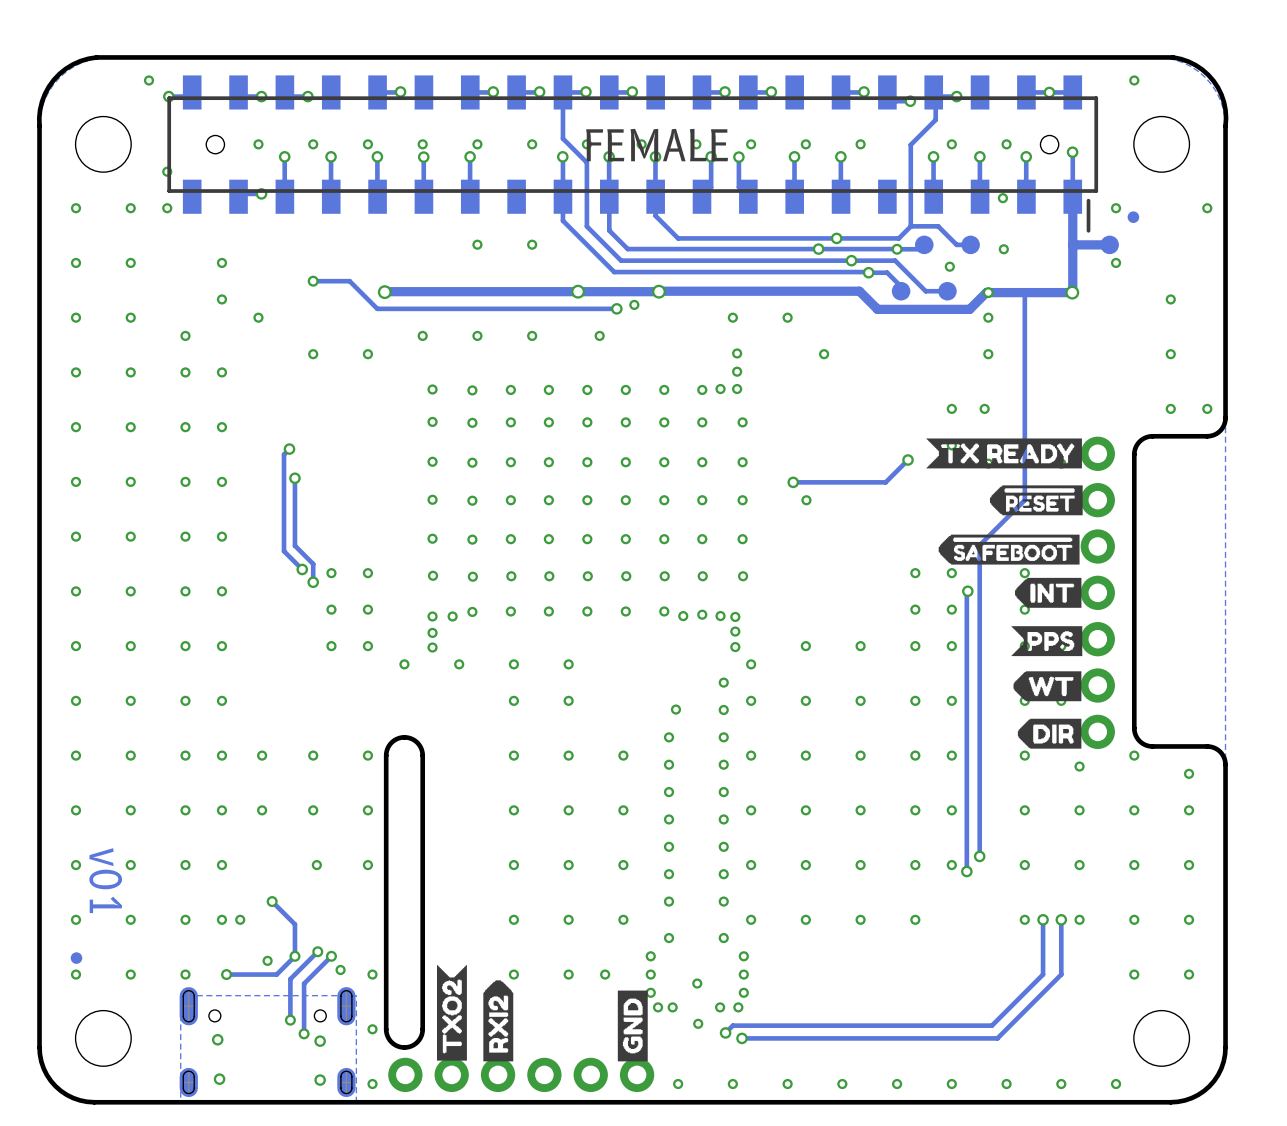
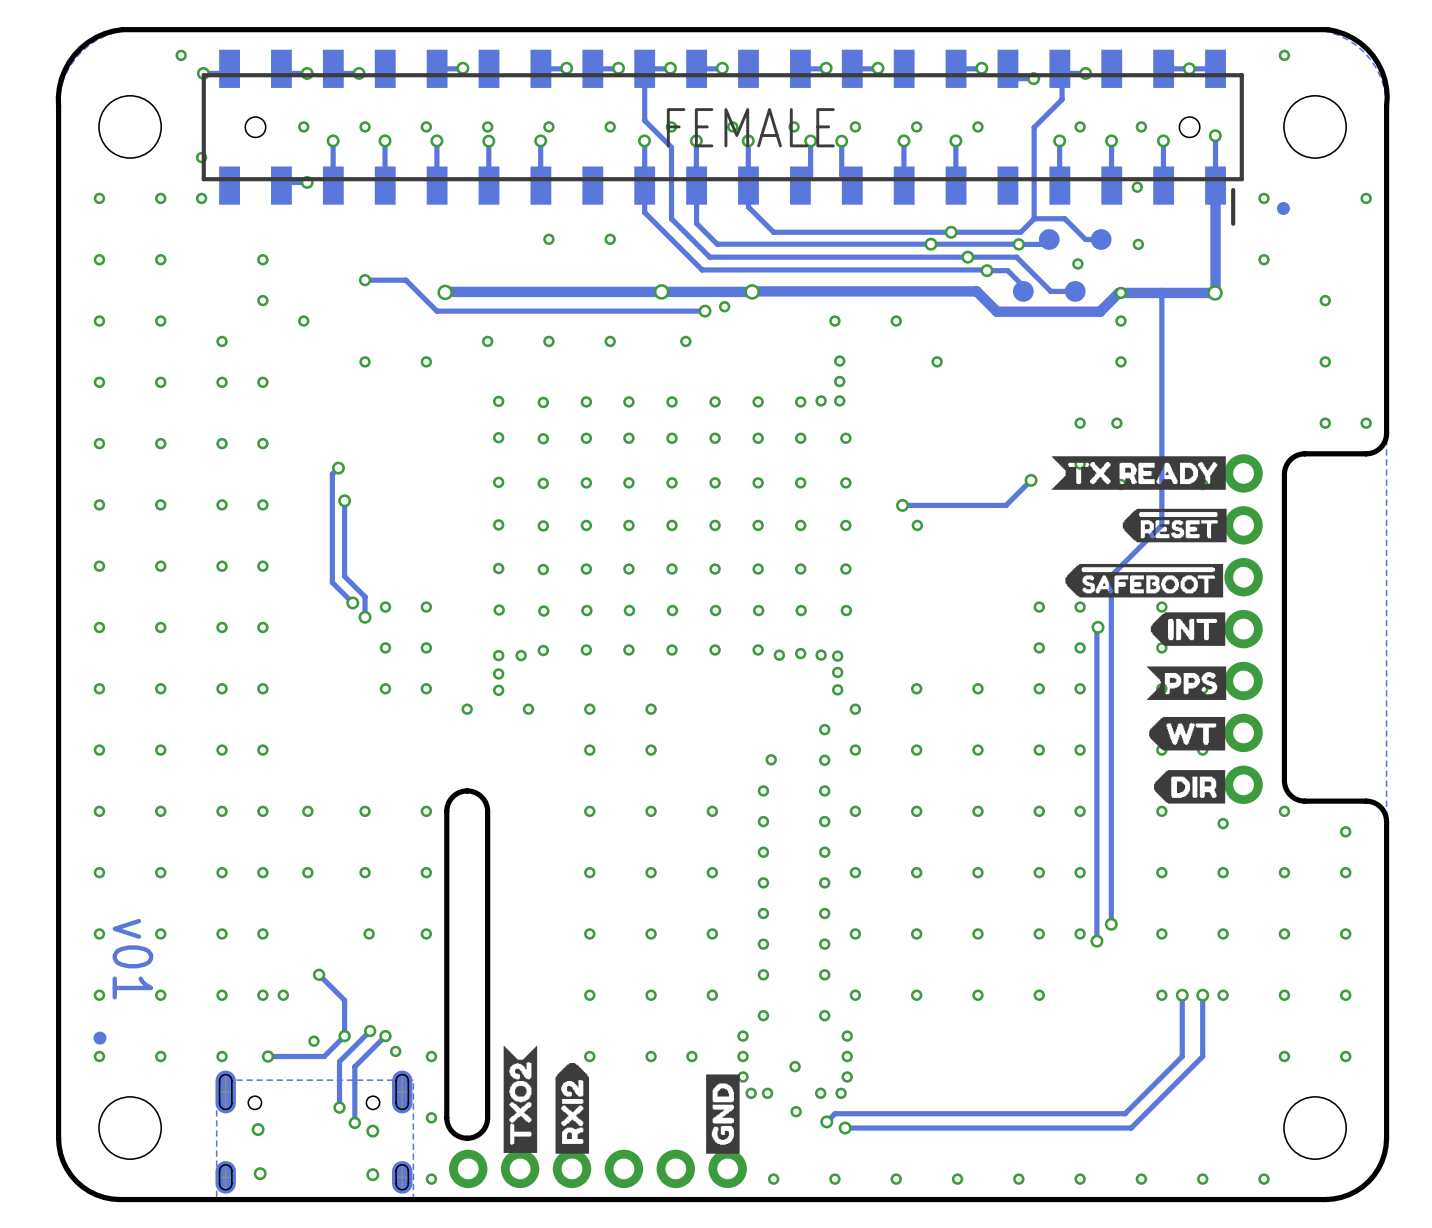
track: (1109, 244) (1072, 244) -> none
part: (1109, 244) -> none

